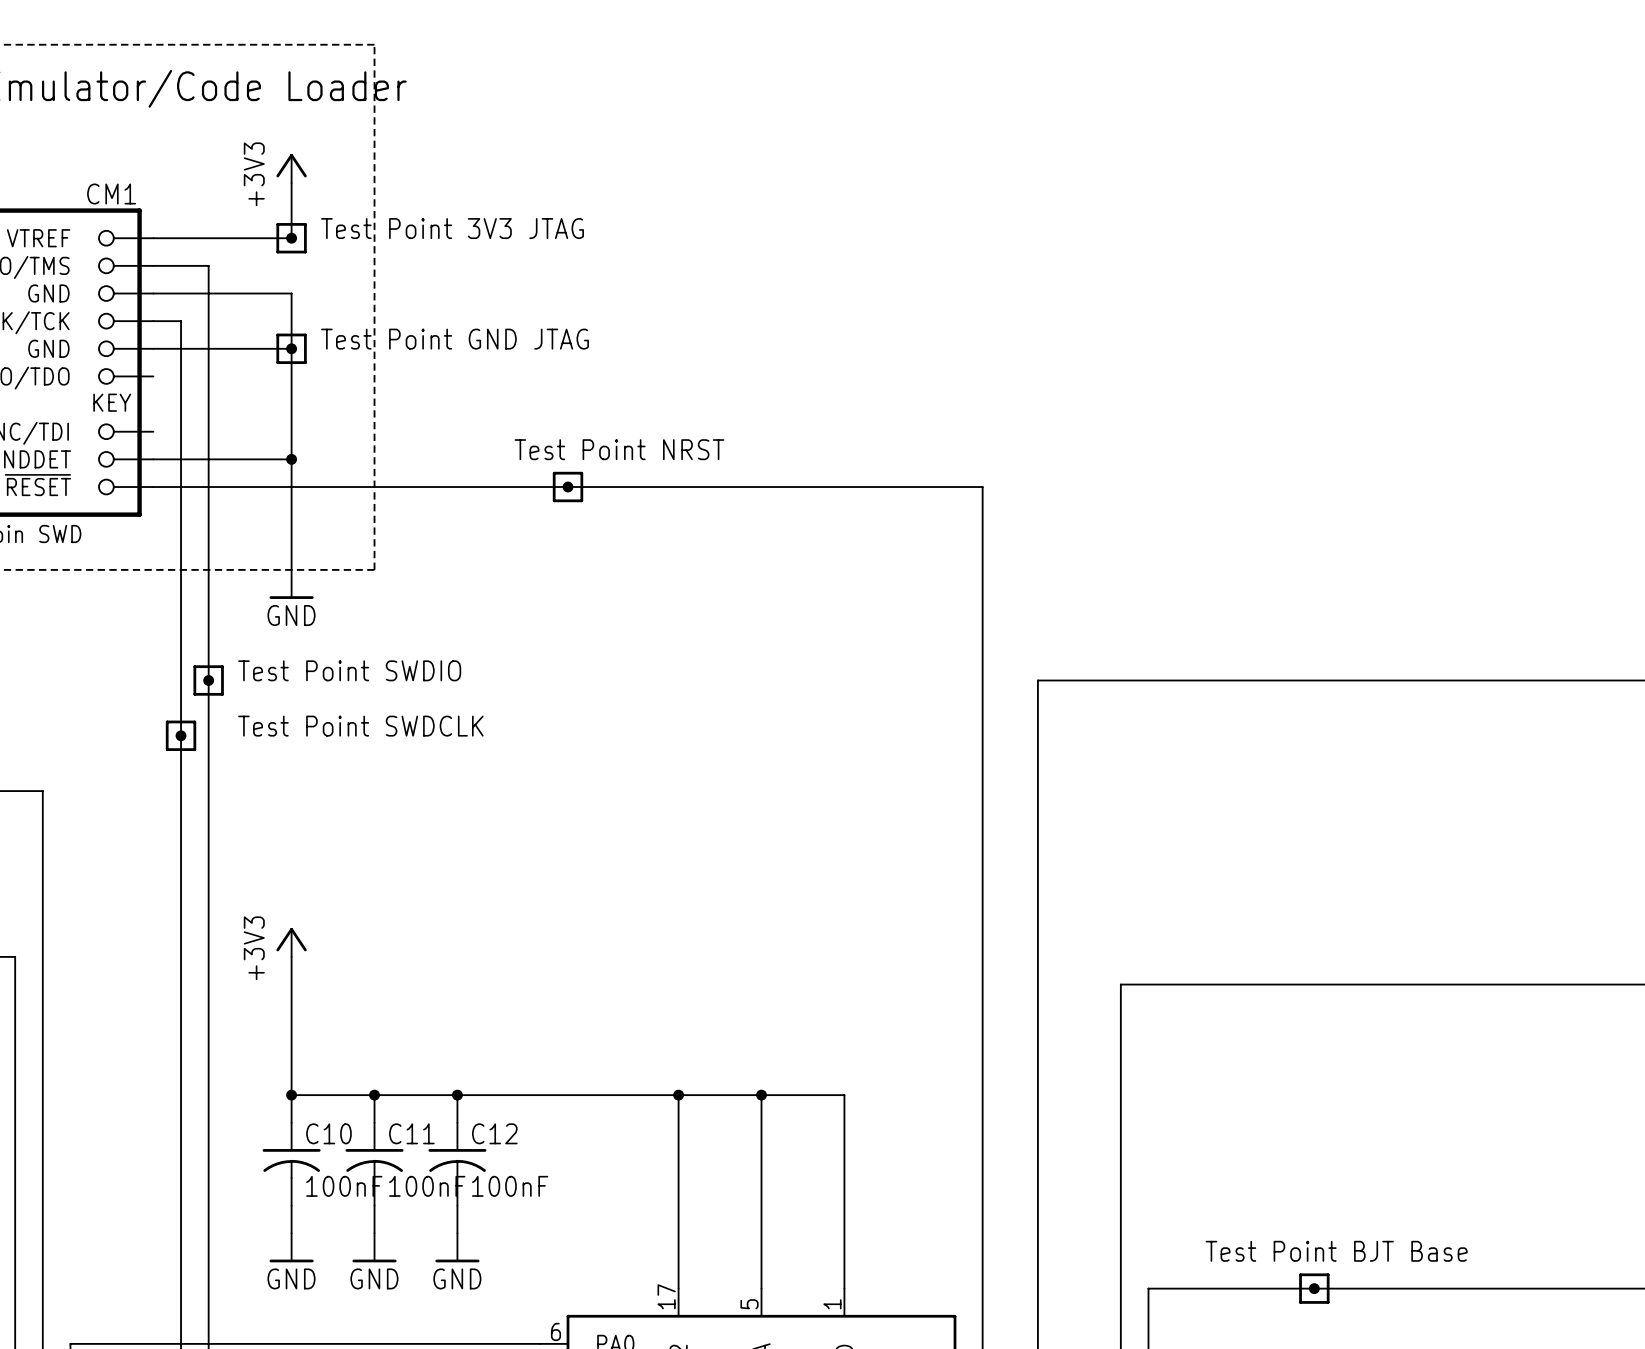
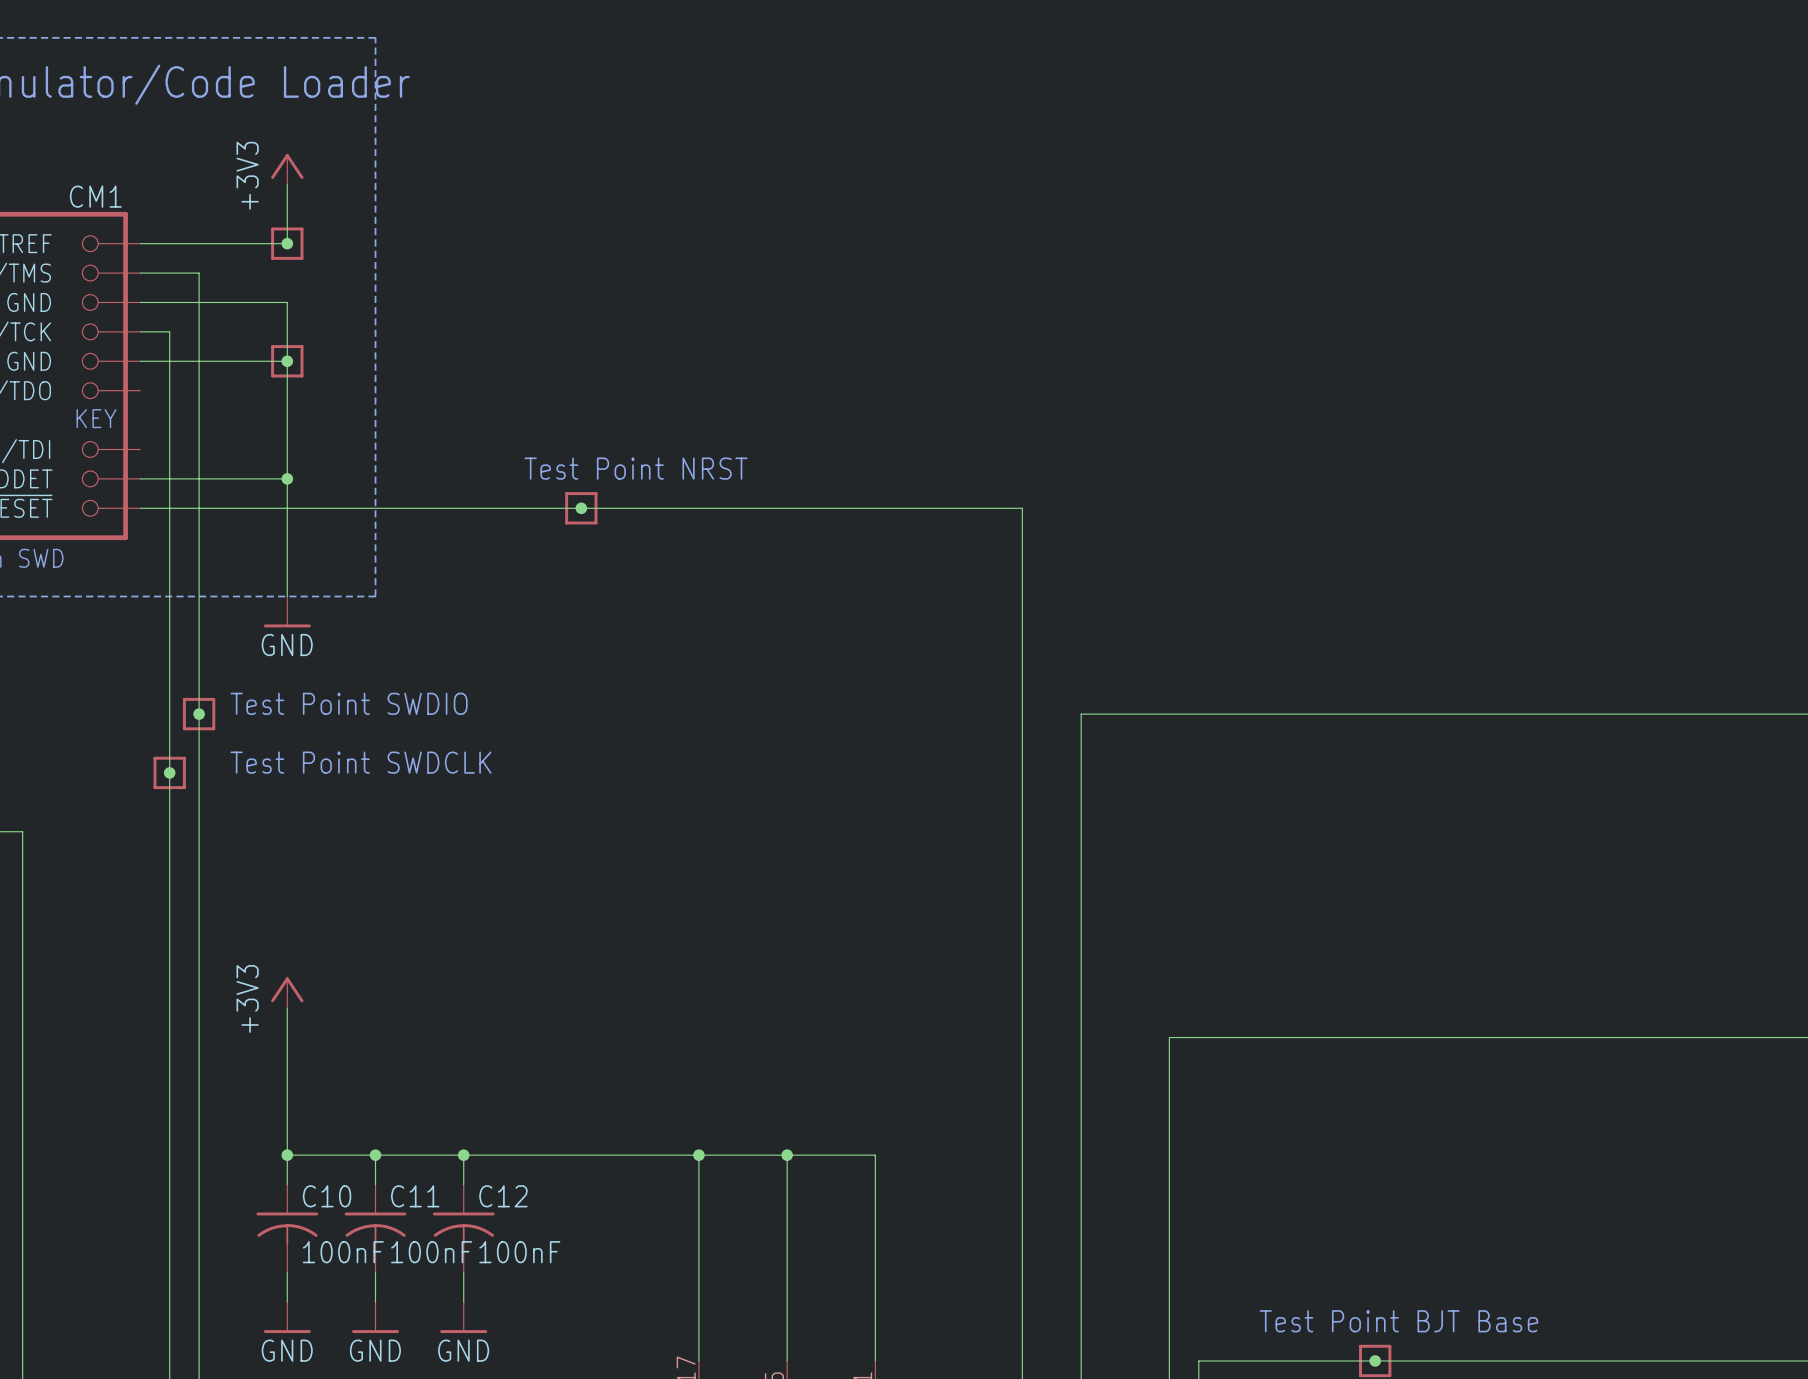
text: Test Point 3V3 JTAG (452, 228) -> none
text: Test Point GND JTAG (455, 339) -> none

